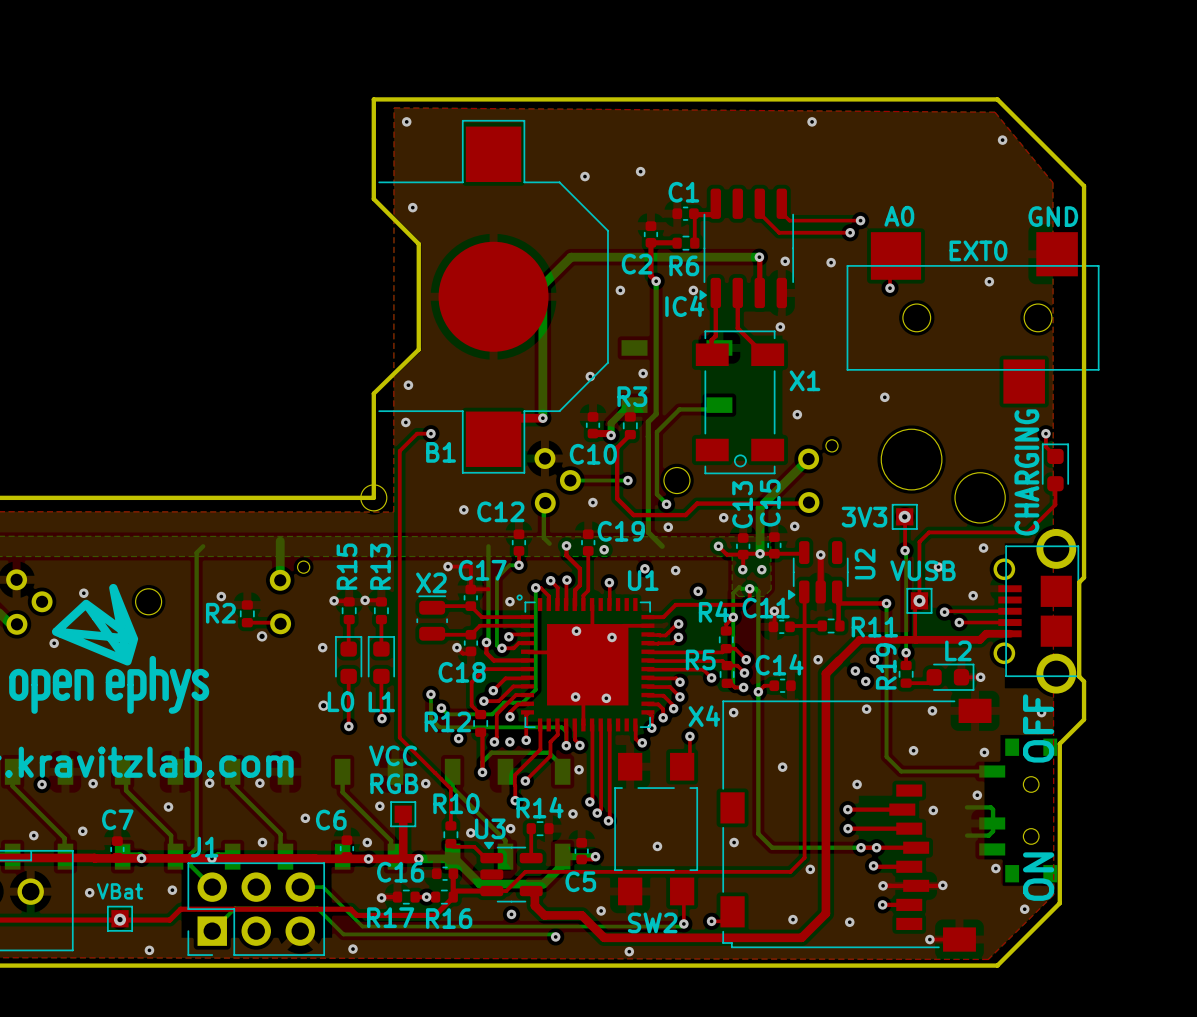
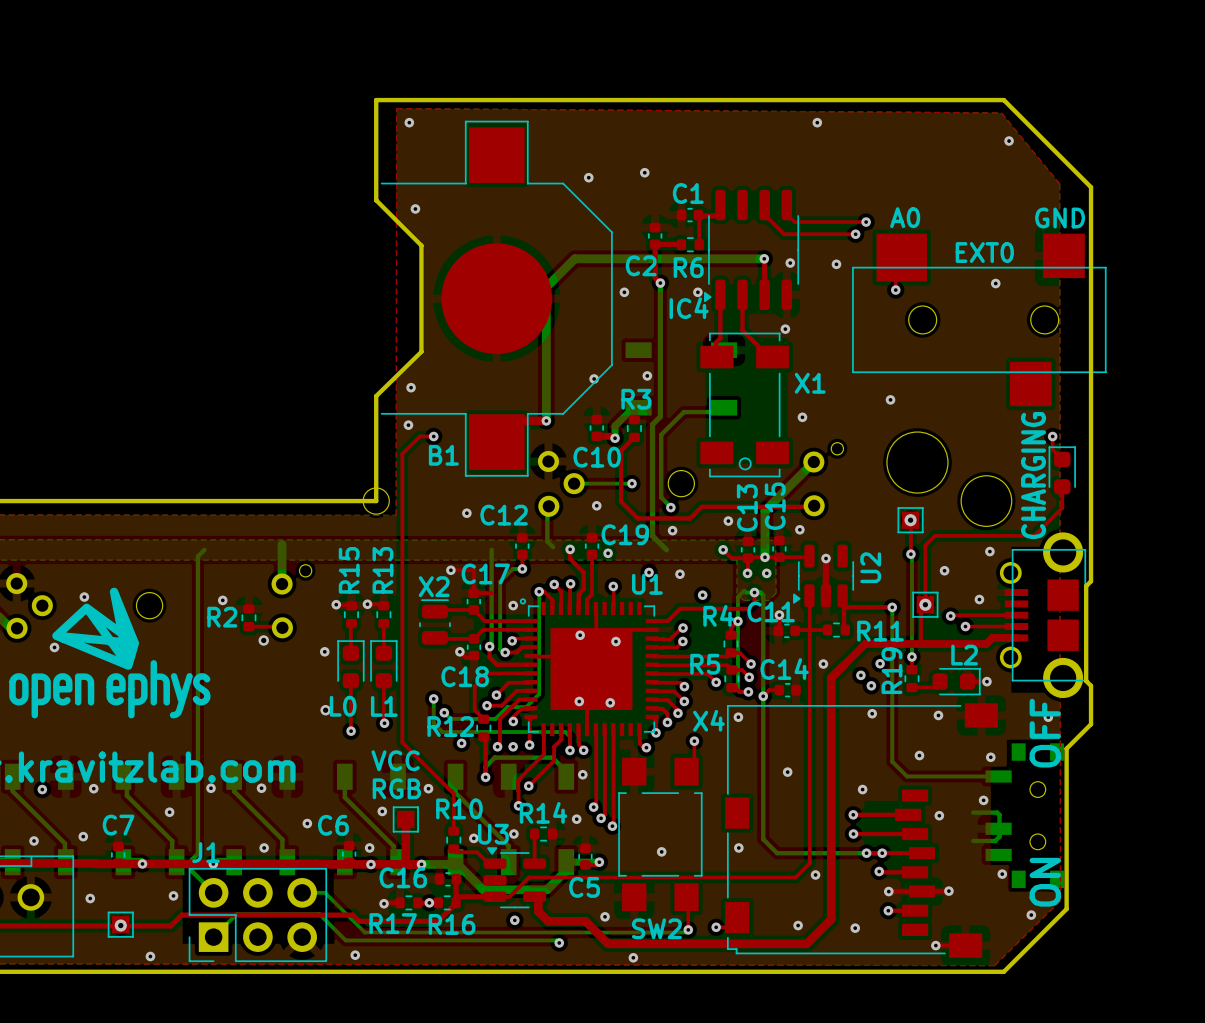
part value: 3V3 (864, 517) -> none
part value: VUSB (922, 570) -> none
part value: VBat (120, 891) -> none

